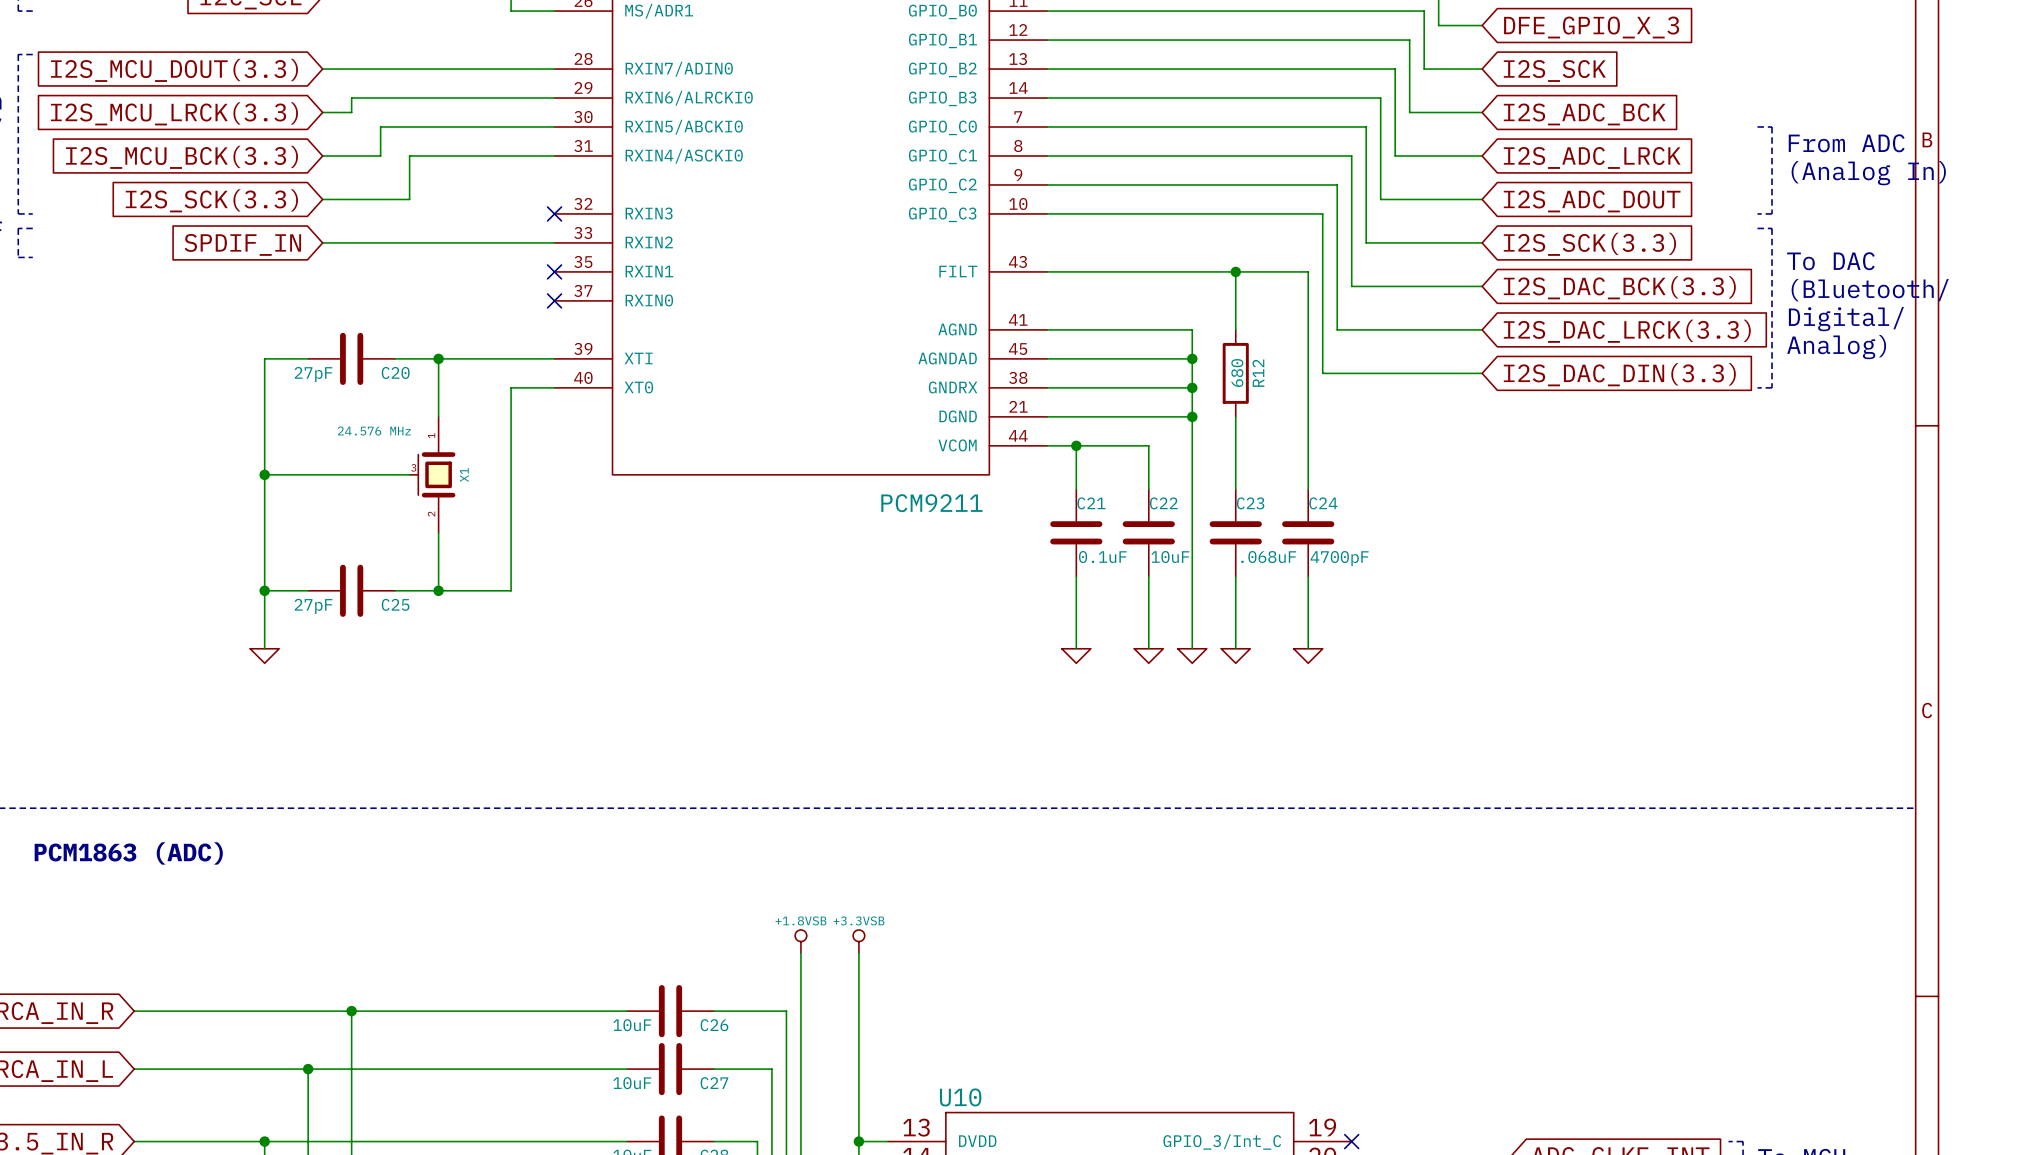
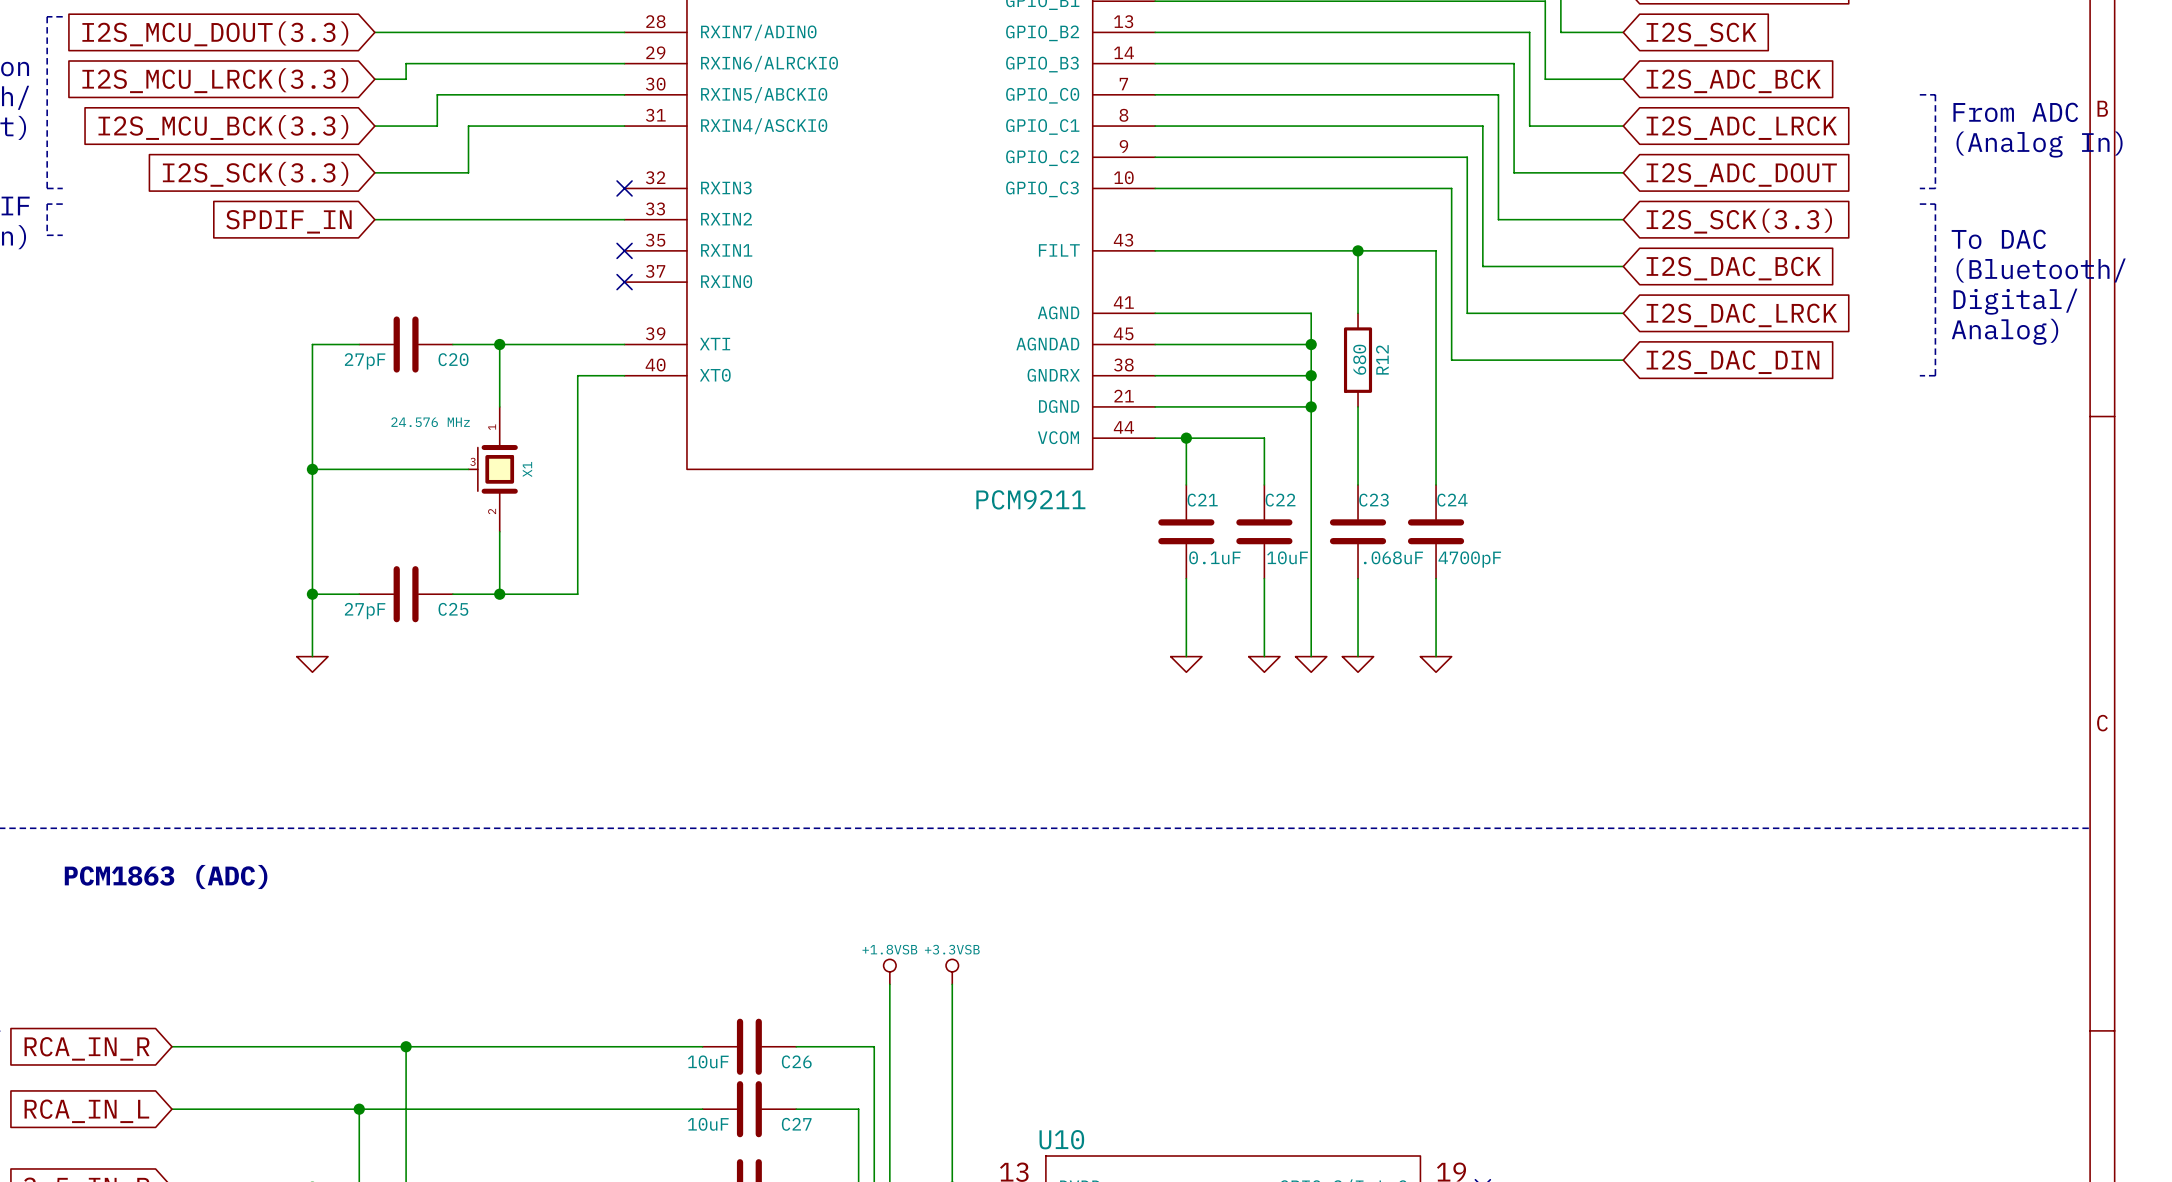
global label: I2S_DAC_BCK(3.3) (1619, 287) -> I2S_DAC_BCK (1733, 268)
global label: I2S_DAC_LRCK(3.3) (1627, 331) -> I2S_DAC_LRCK (1741, 315)
global label: I2S_DAC_DIN(3.3) (1619, 374) -> I2S_DAC_DIN (1732, 362)

